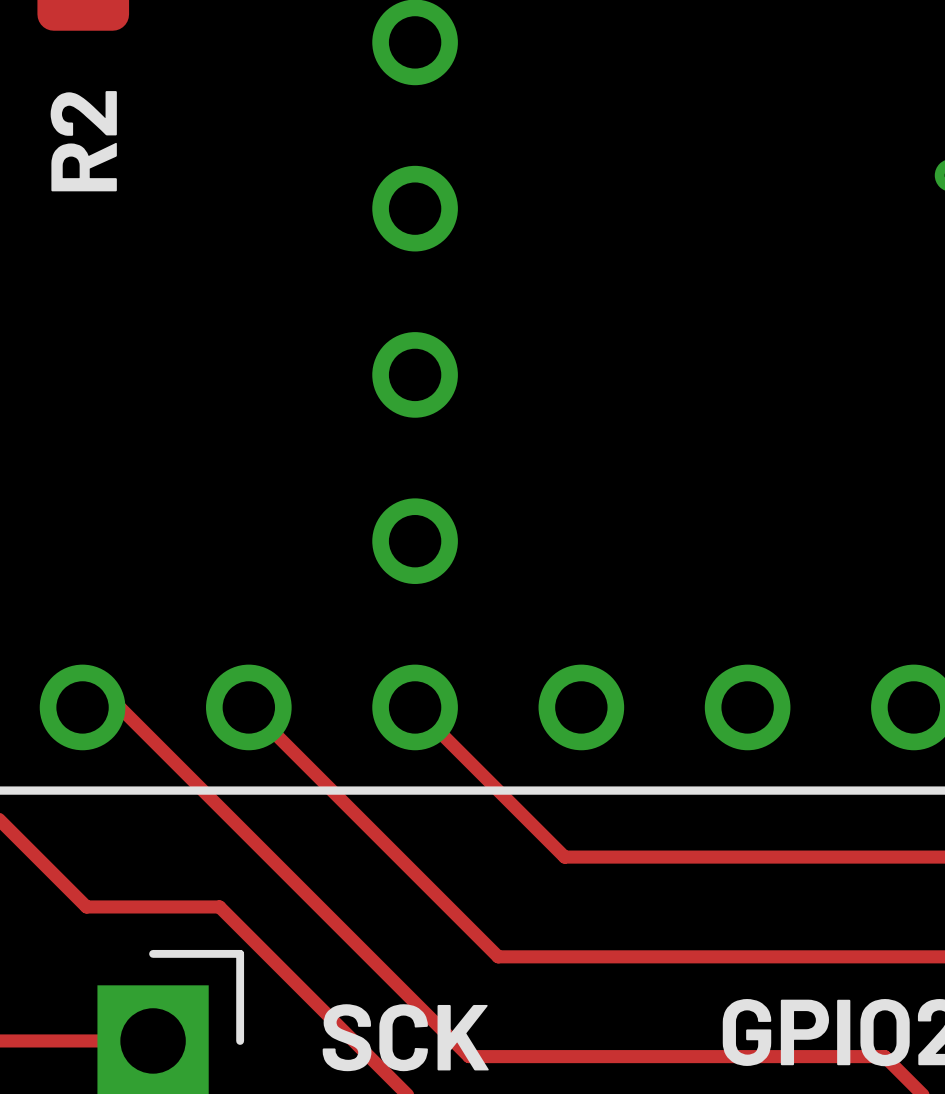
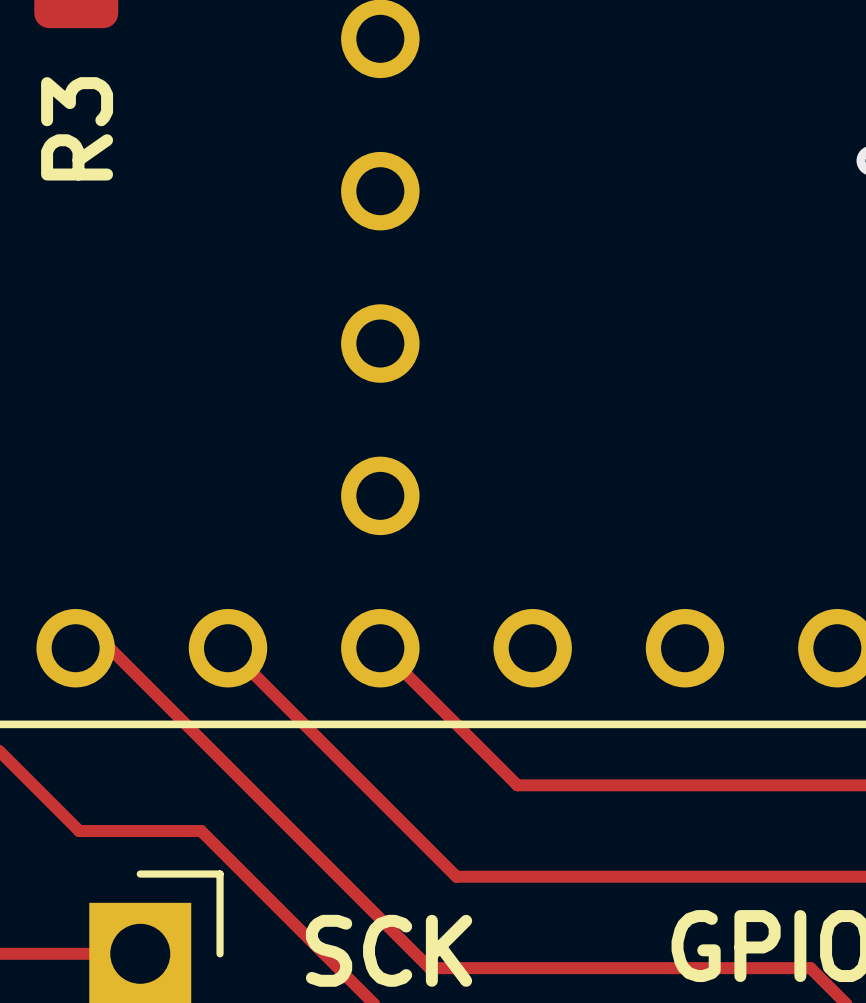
R2 name: R2 (83, 141) -> R3 (77, 128)

